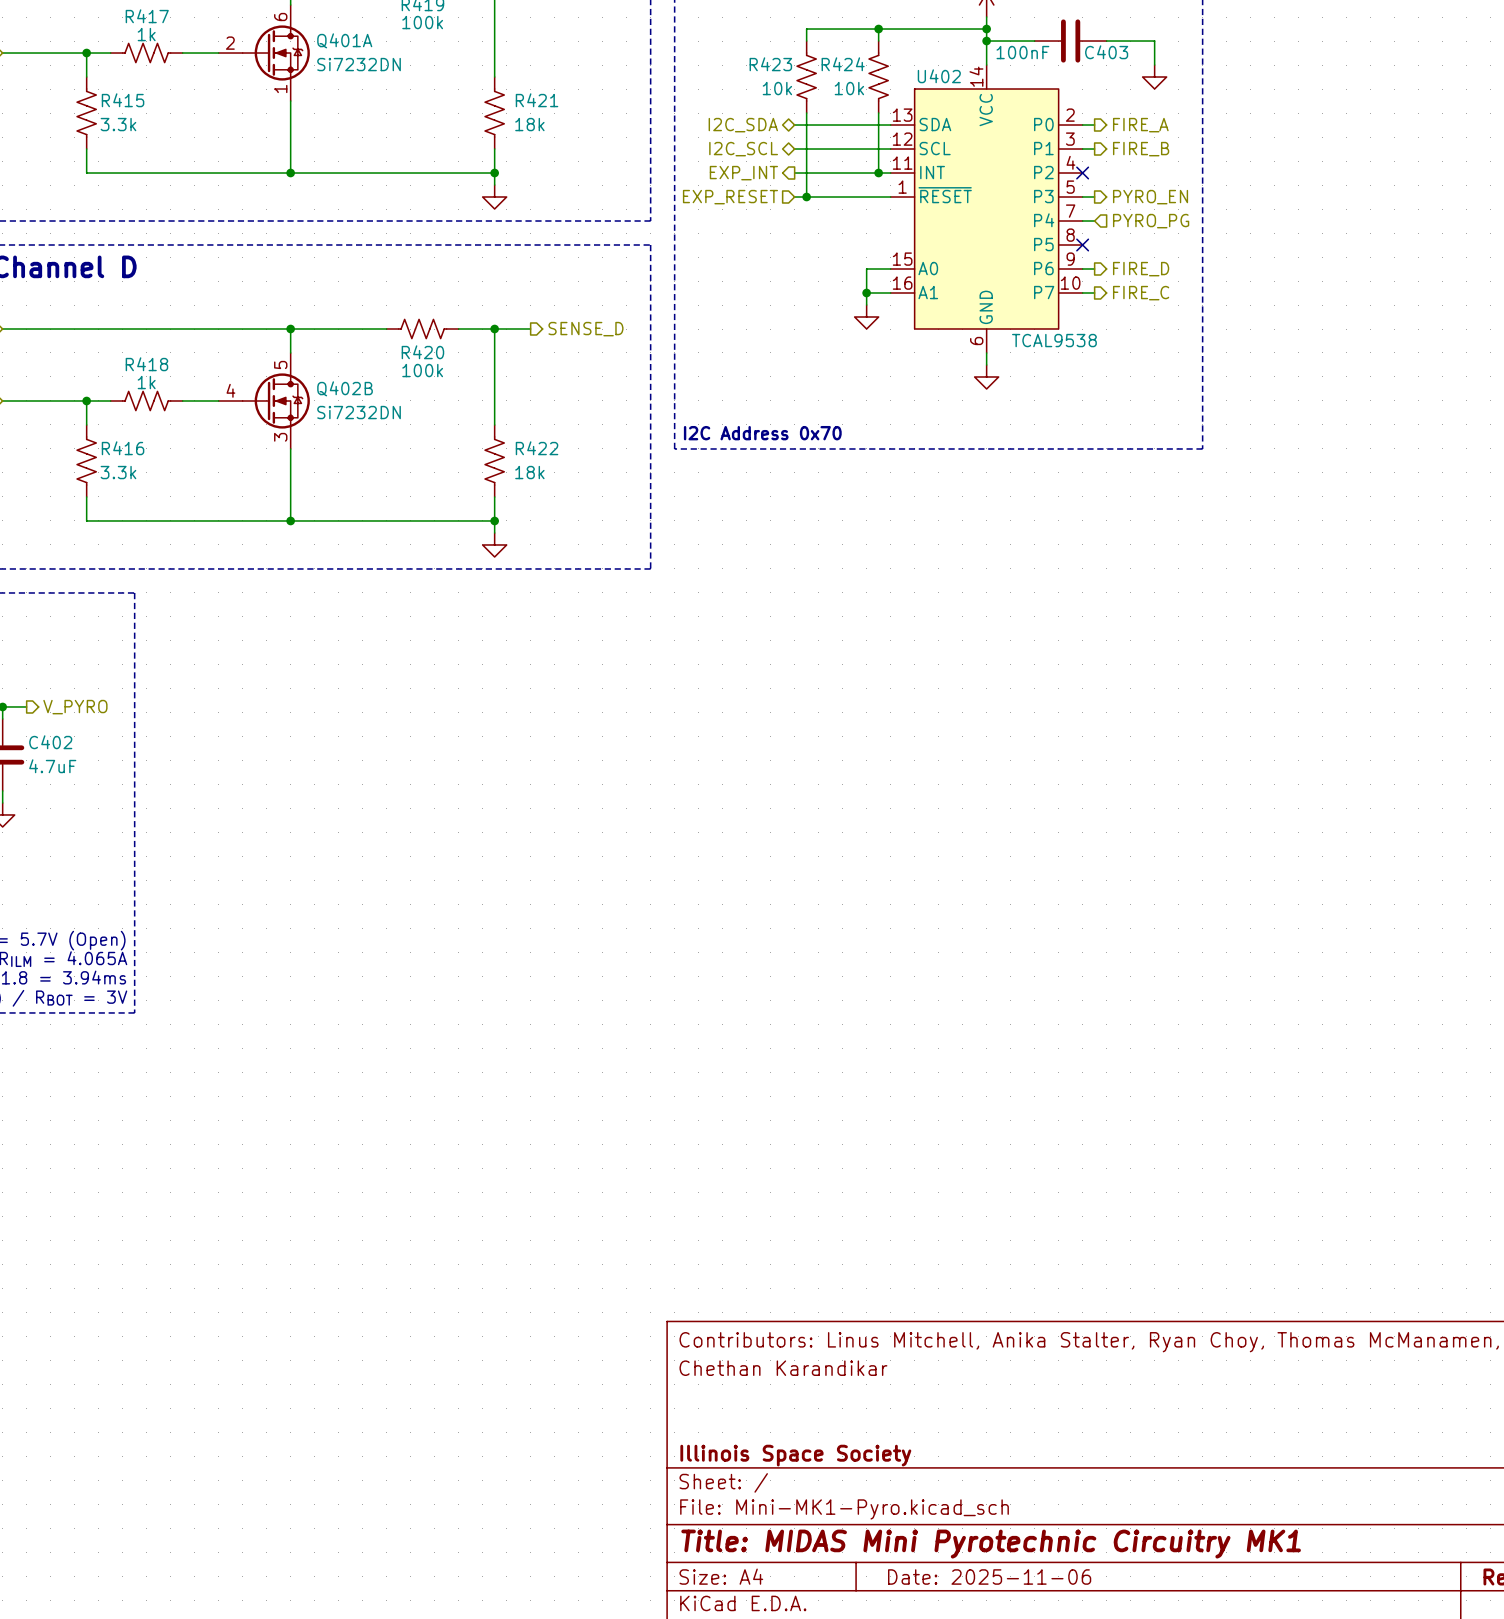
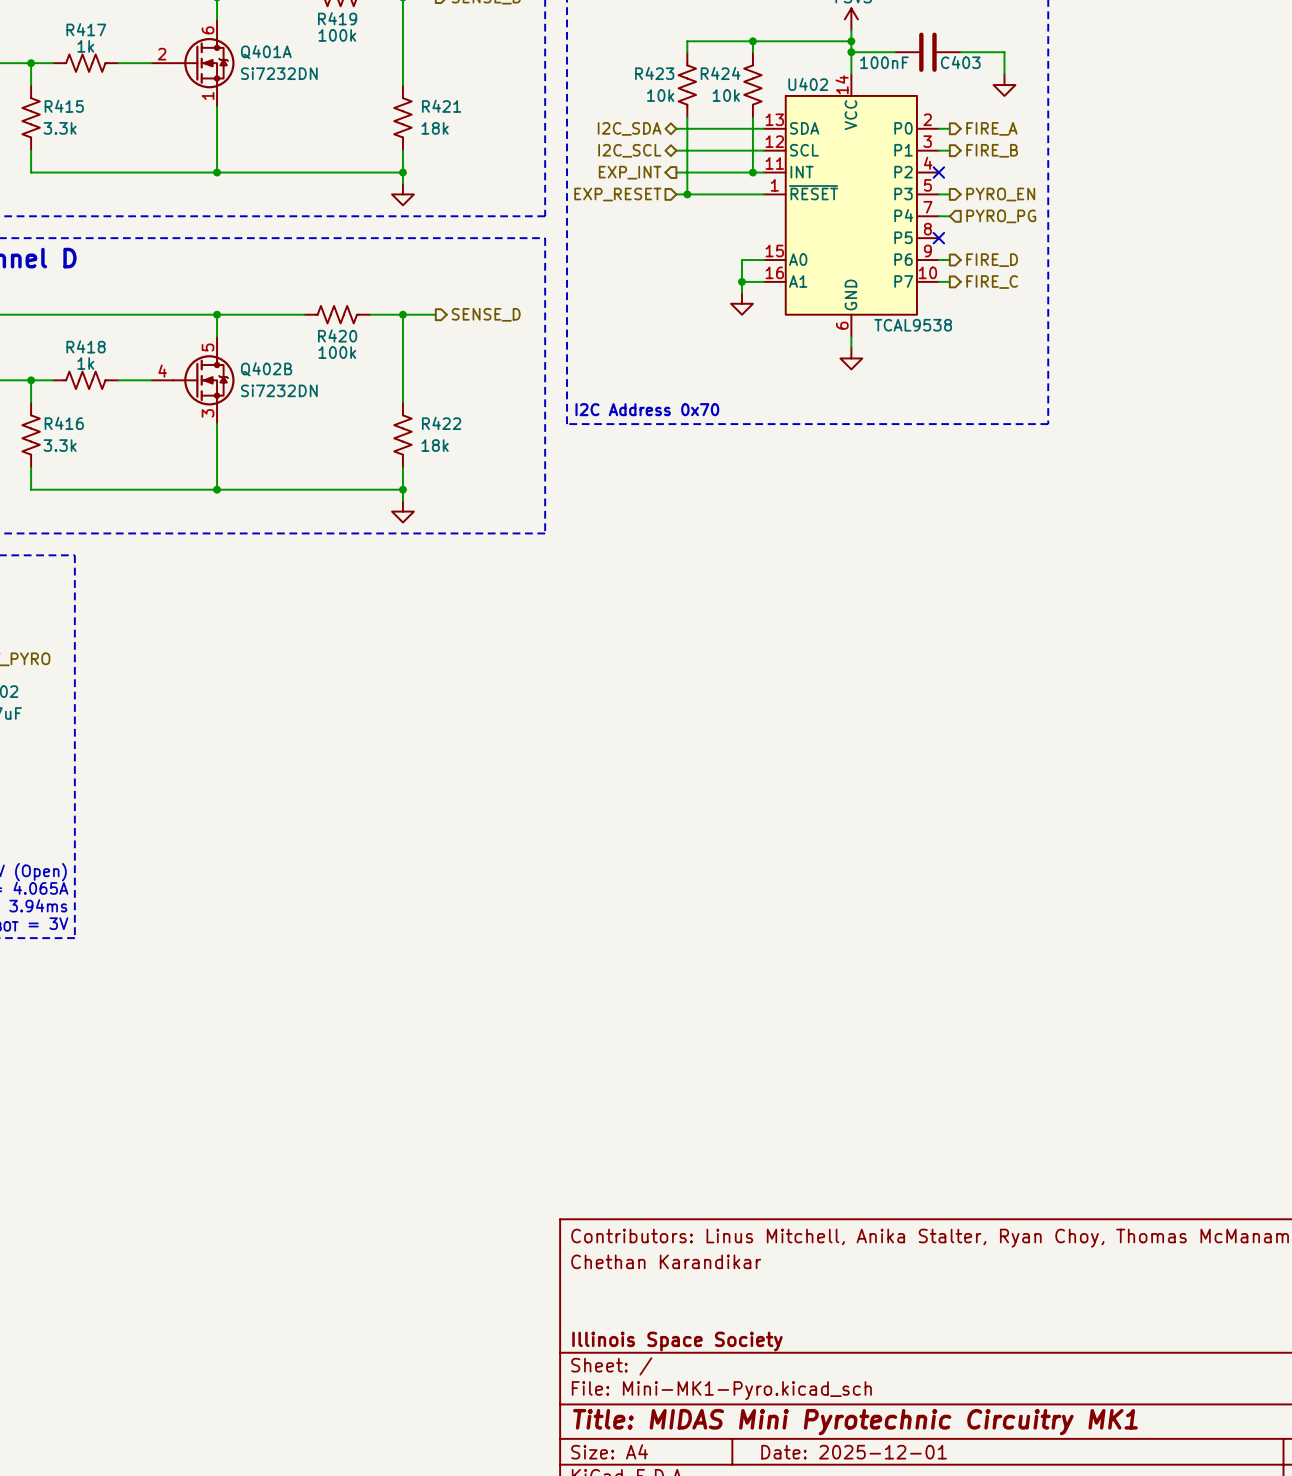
title block: Date: 2025-11-06 (989, 1577) -> Date: 2025-12-01 (854, 1452)

